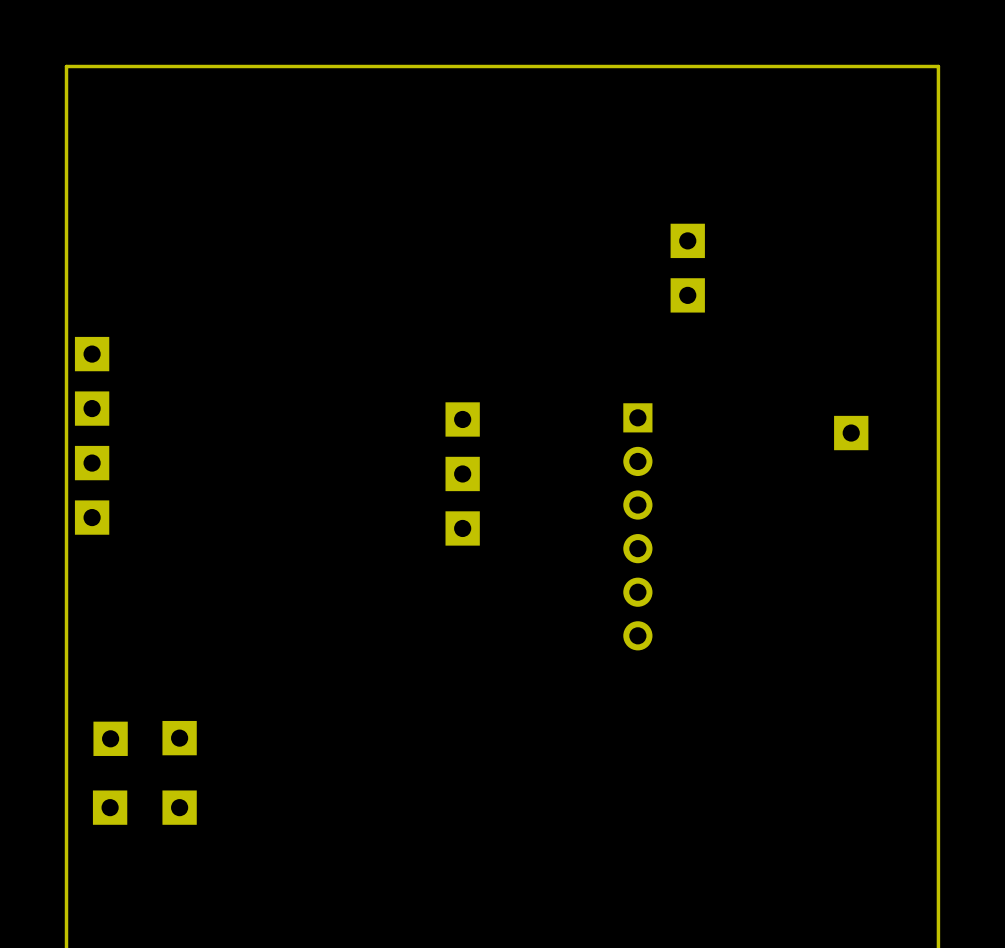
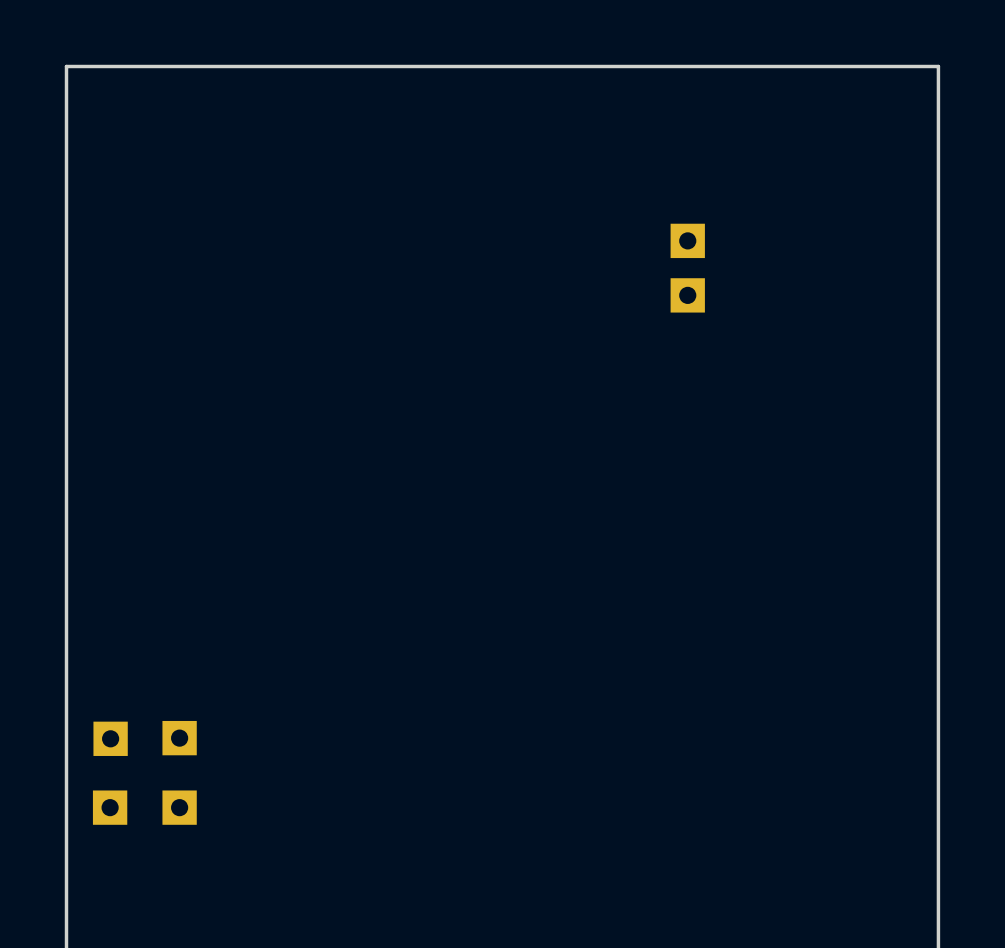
part: (92, 354) -> none
part: (92, 408) -> none
part: (462, 419) -> none
part: (851, 433) -> none
part: (92, 463) -> none
part: (462, 473) -> none
part: (92, 517) -> none
part: (637, 526) -> none
part: (462, 528) -> none

